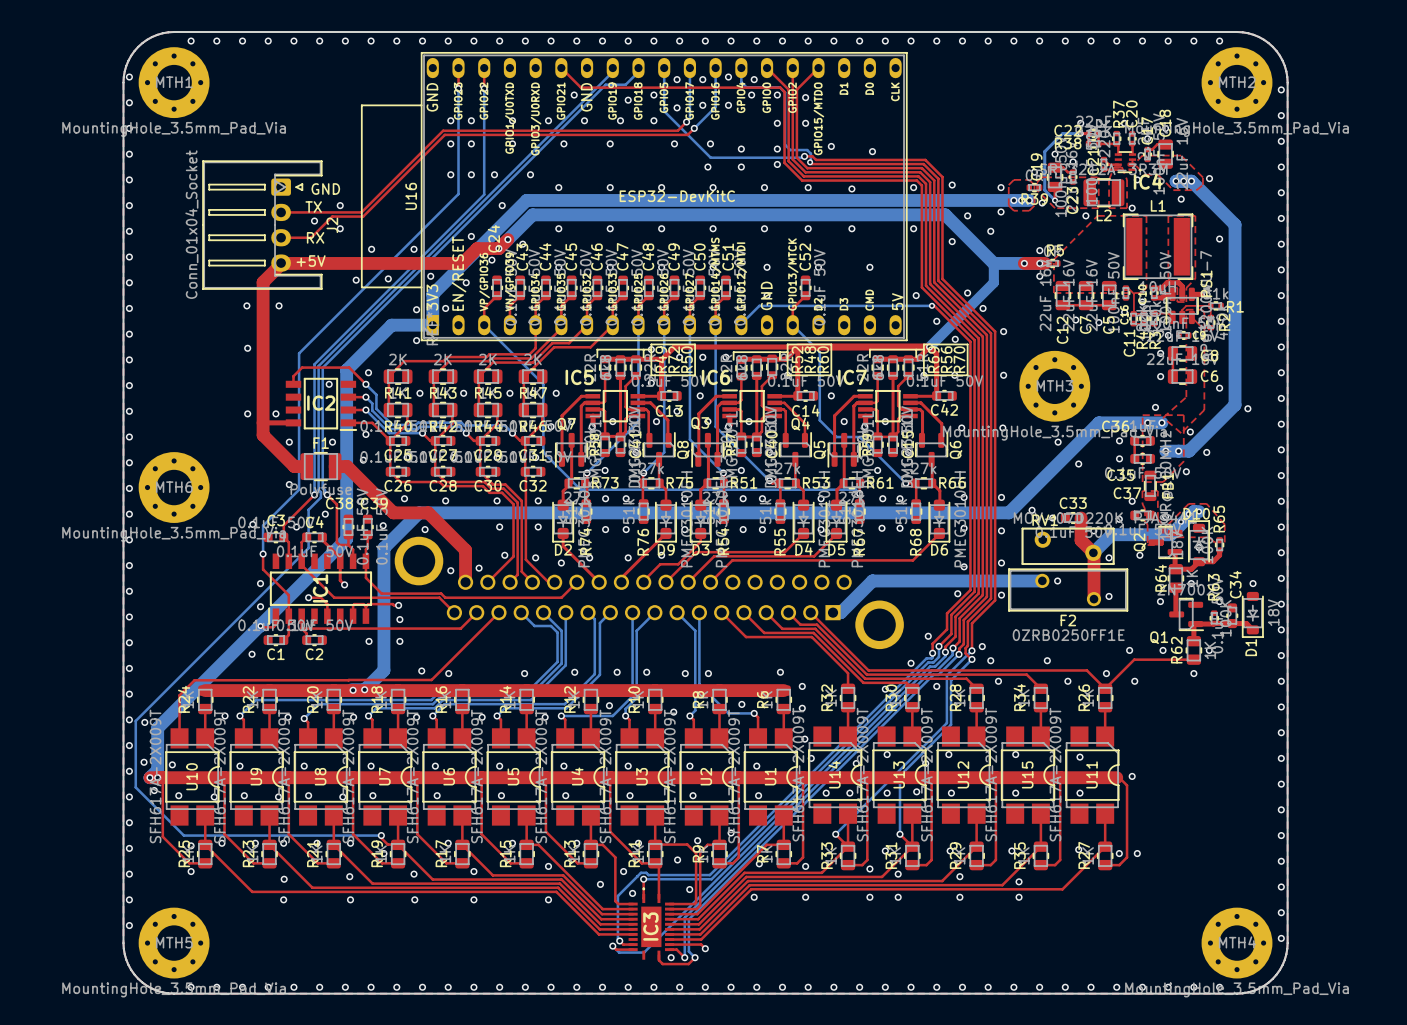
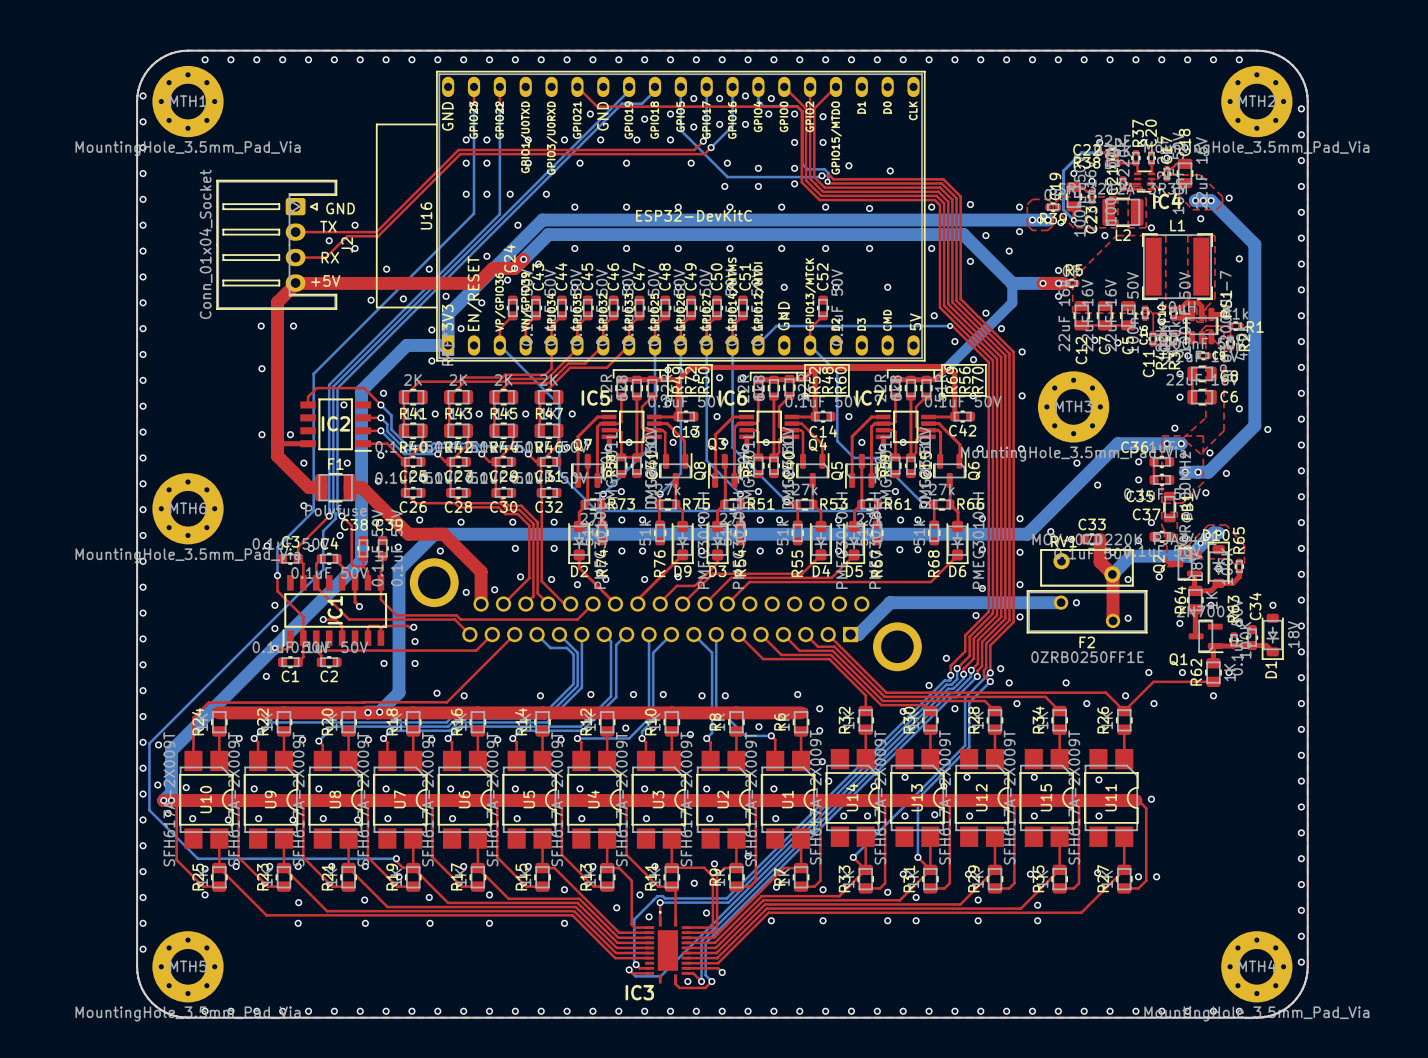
IC3 name rotation: 0° (650, 926) -> 90° clockwise (639, 992)
IC3 name position: IC3 (650, 926) -> IC3 (639, 992)

